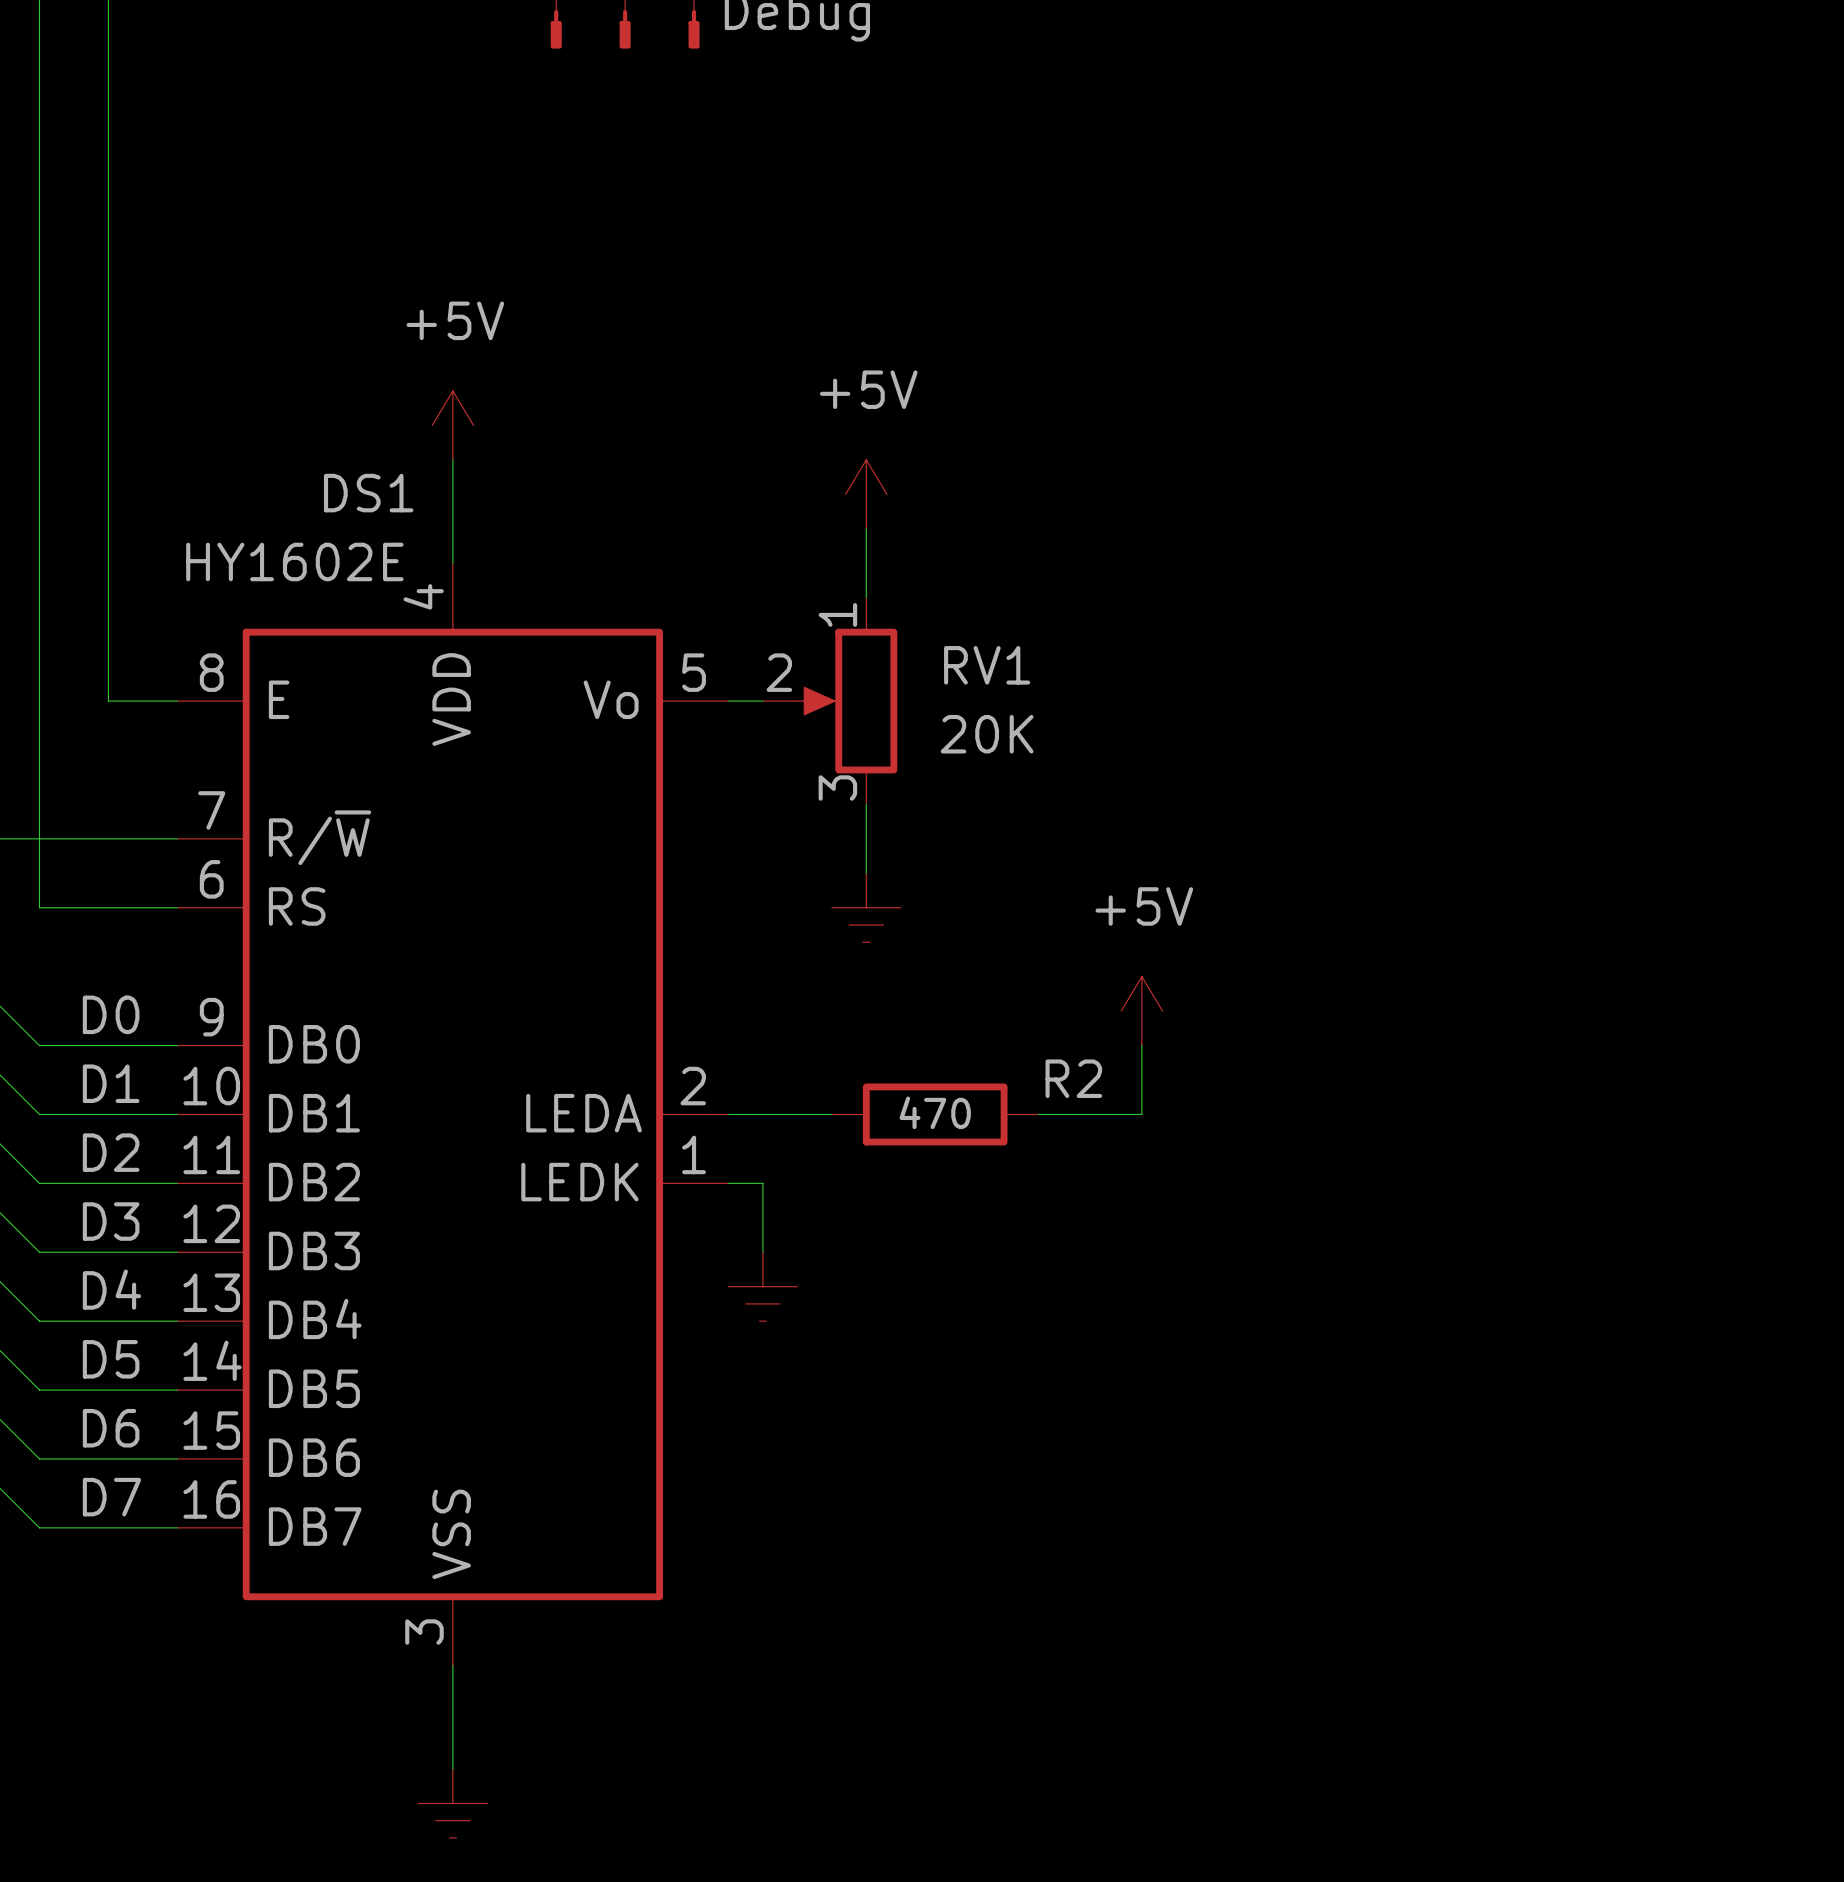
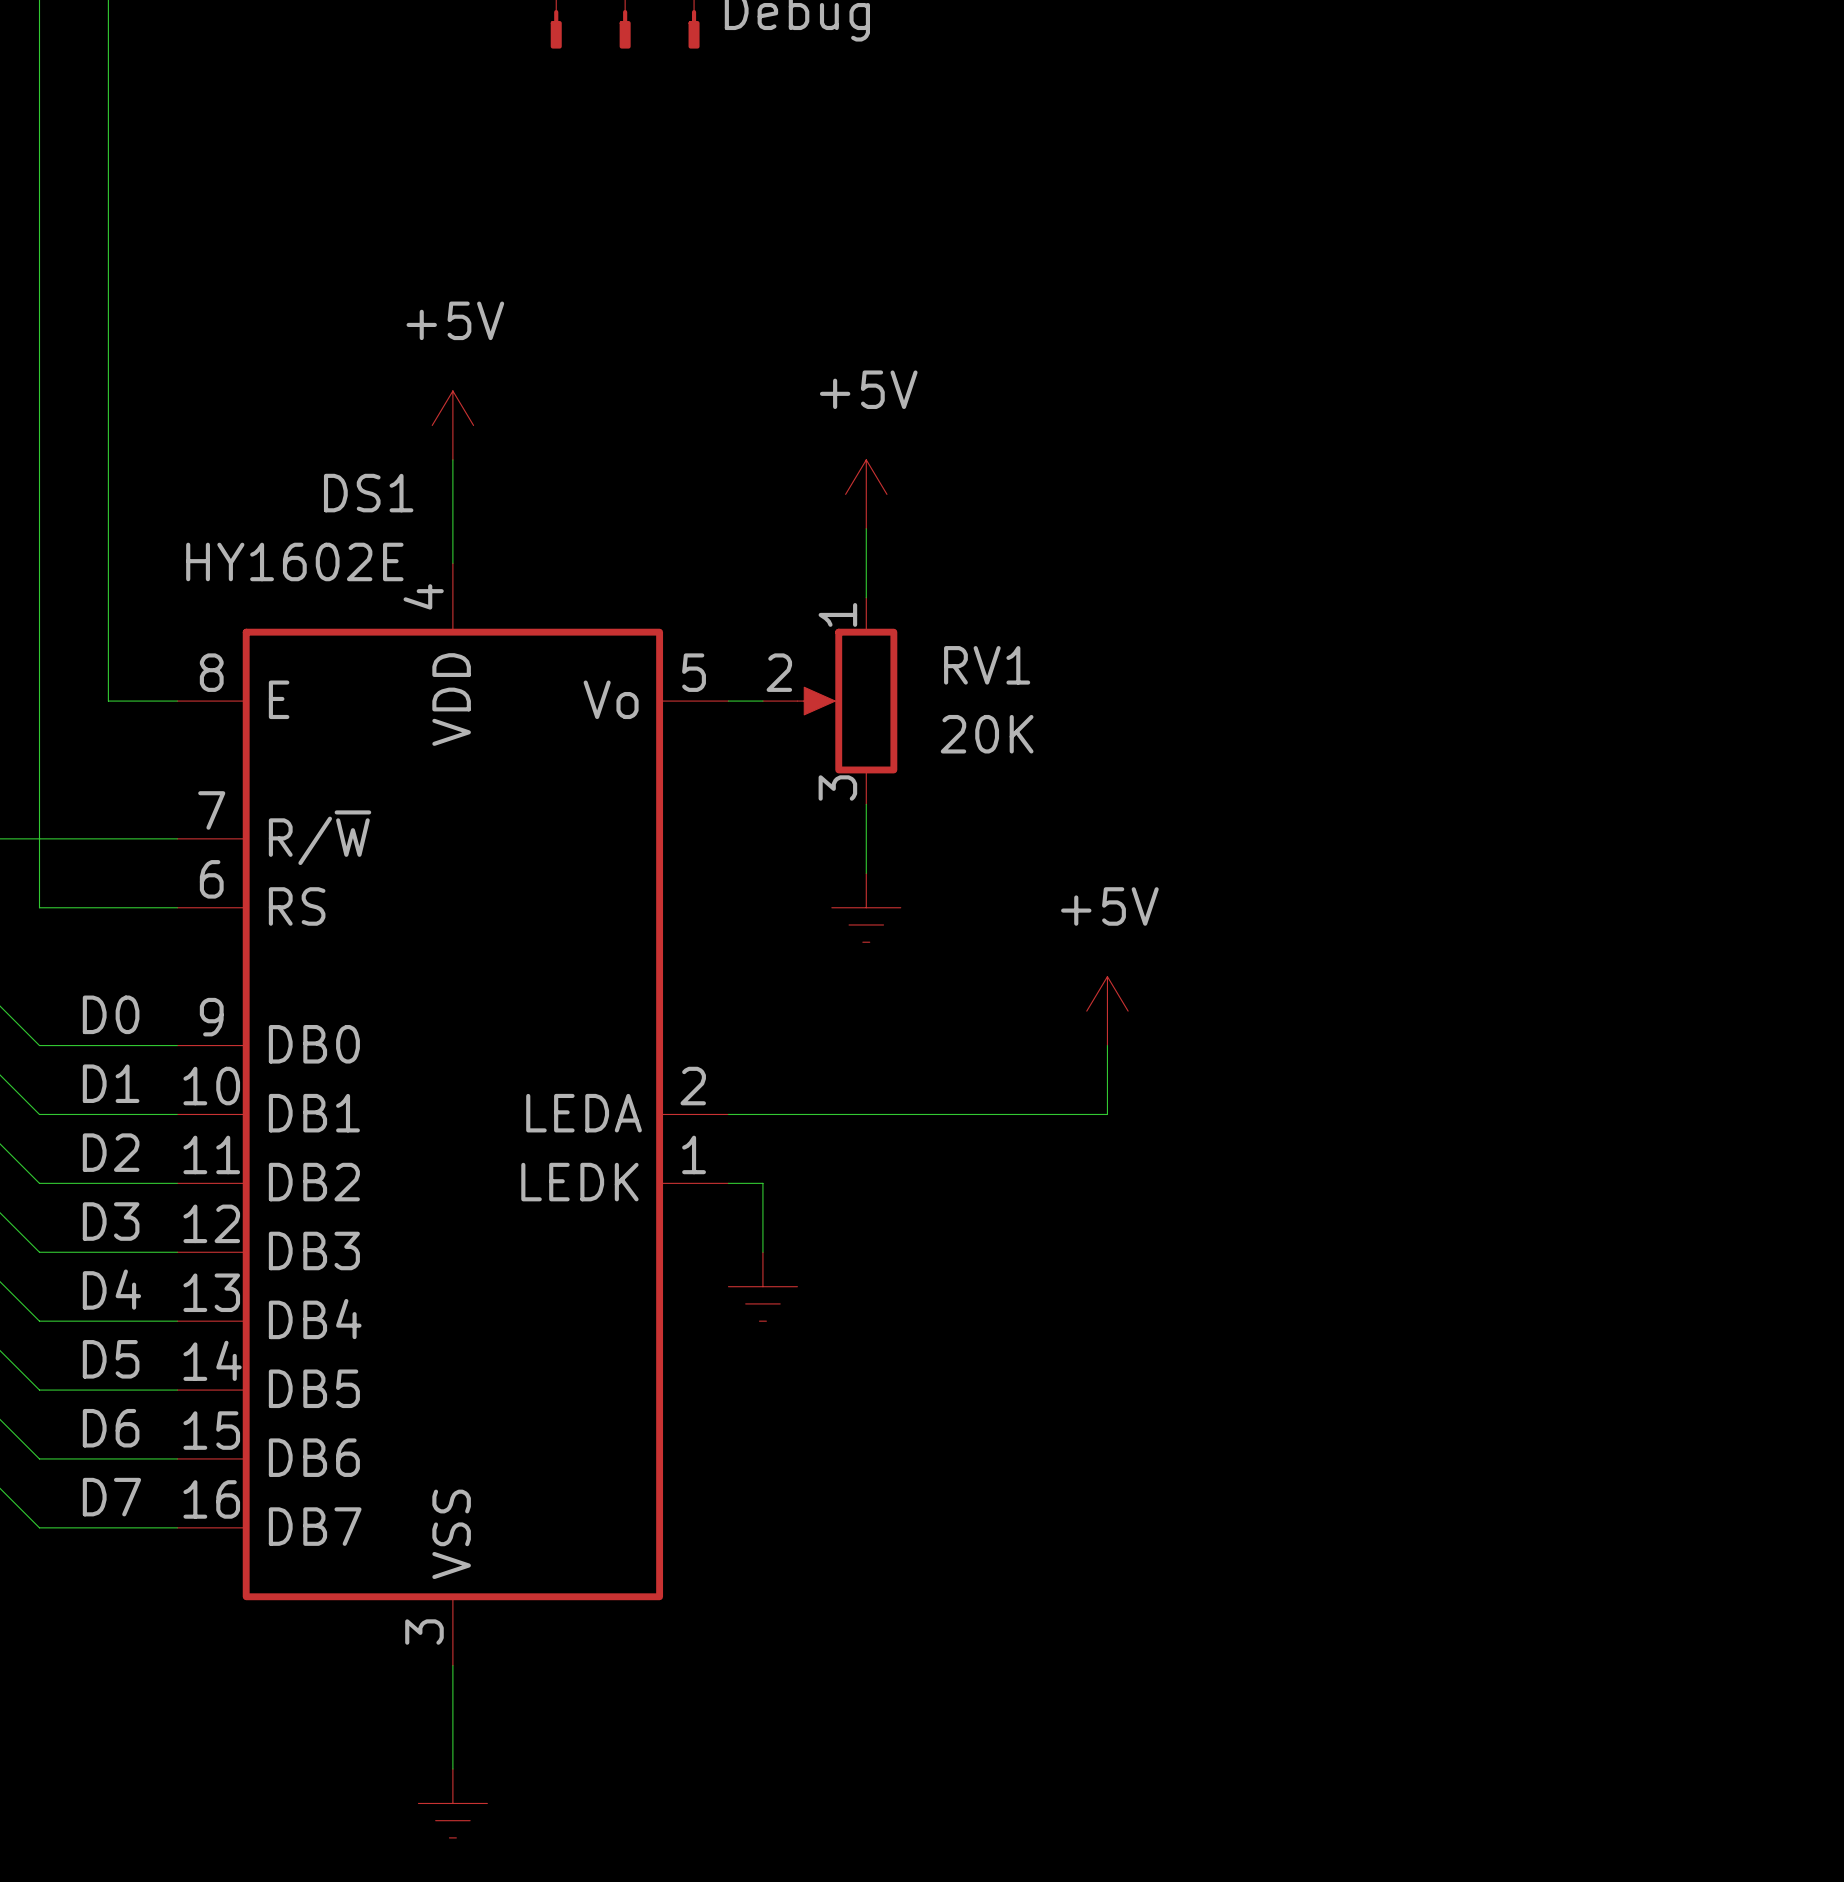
power symbol position: +5V (1141, 1011) -> +5V (1107, 1011)
wire: (1141, 1045) (1141, 1114) (1107, 1114) -> (1107, 1045) (1107, 1114)
wire: none -> (831, 1114) (1038, 1114)
R2: 470 (935, 1114) -> none

